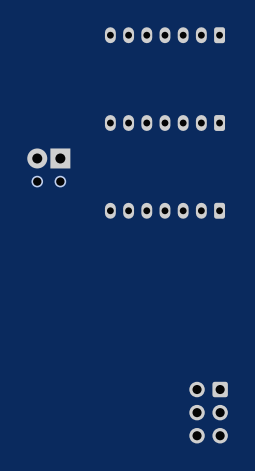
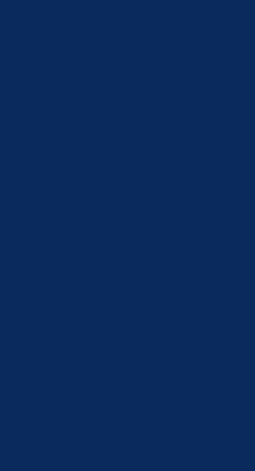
part: (164, 35) -> none
part: (164, 122) -> none
part: (48, 167) -> none
part: (164, 210) -> none
part: (208, 412) -> none

